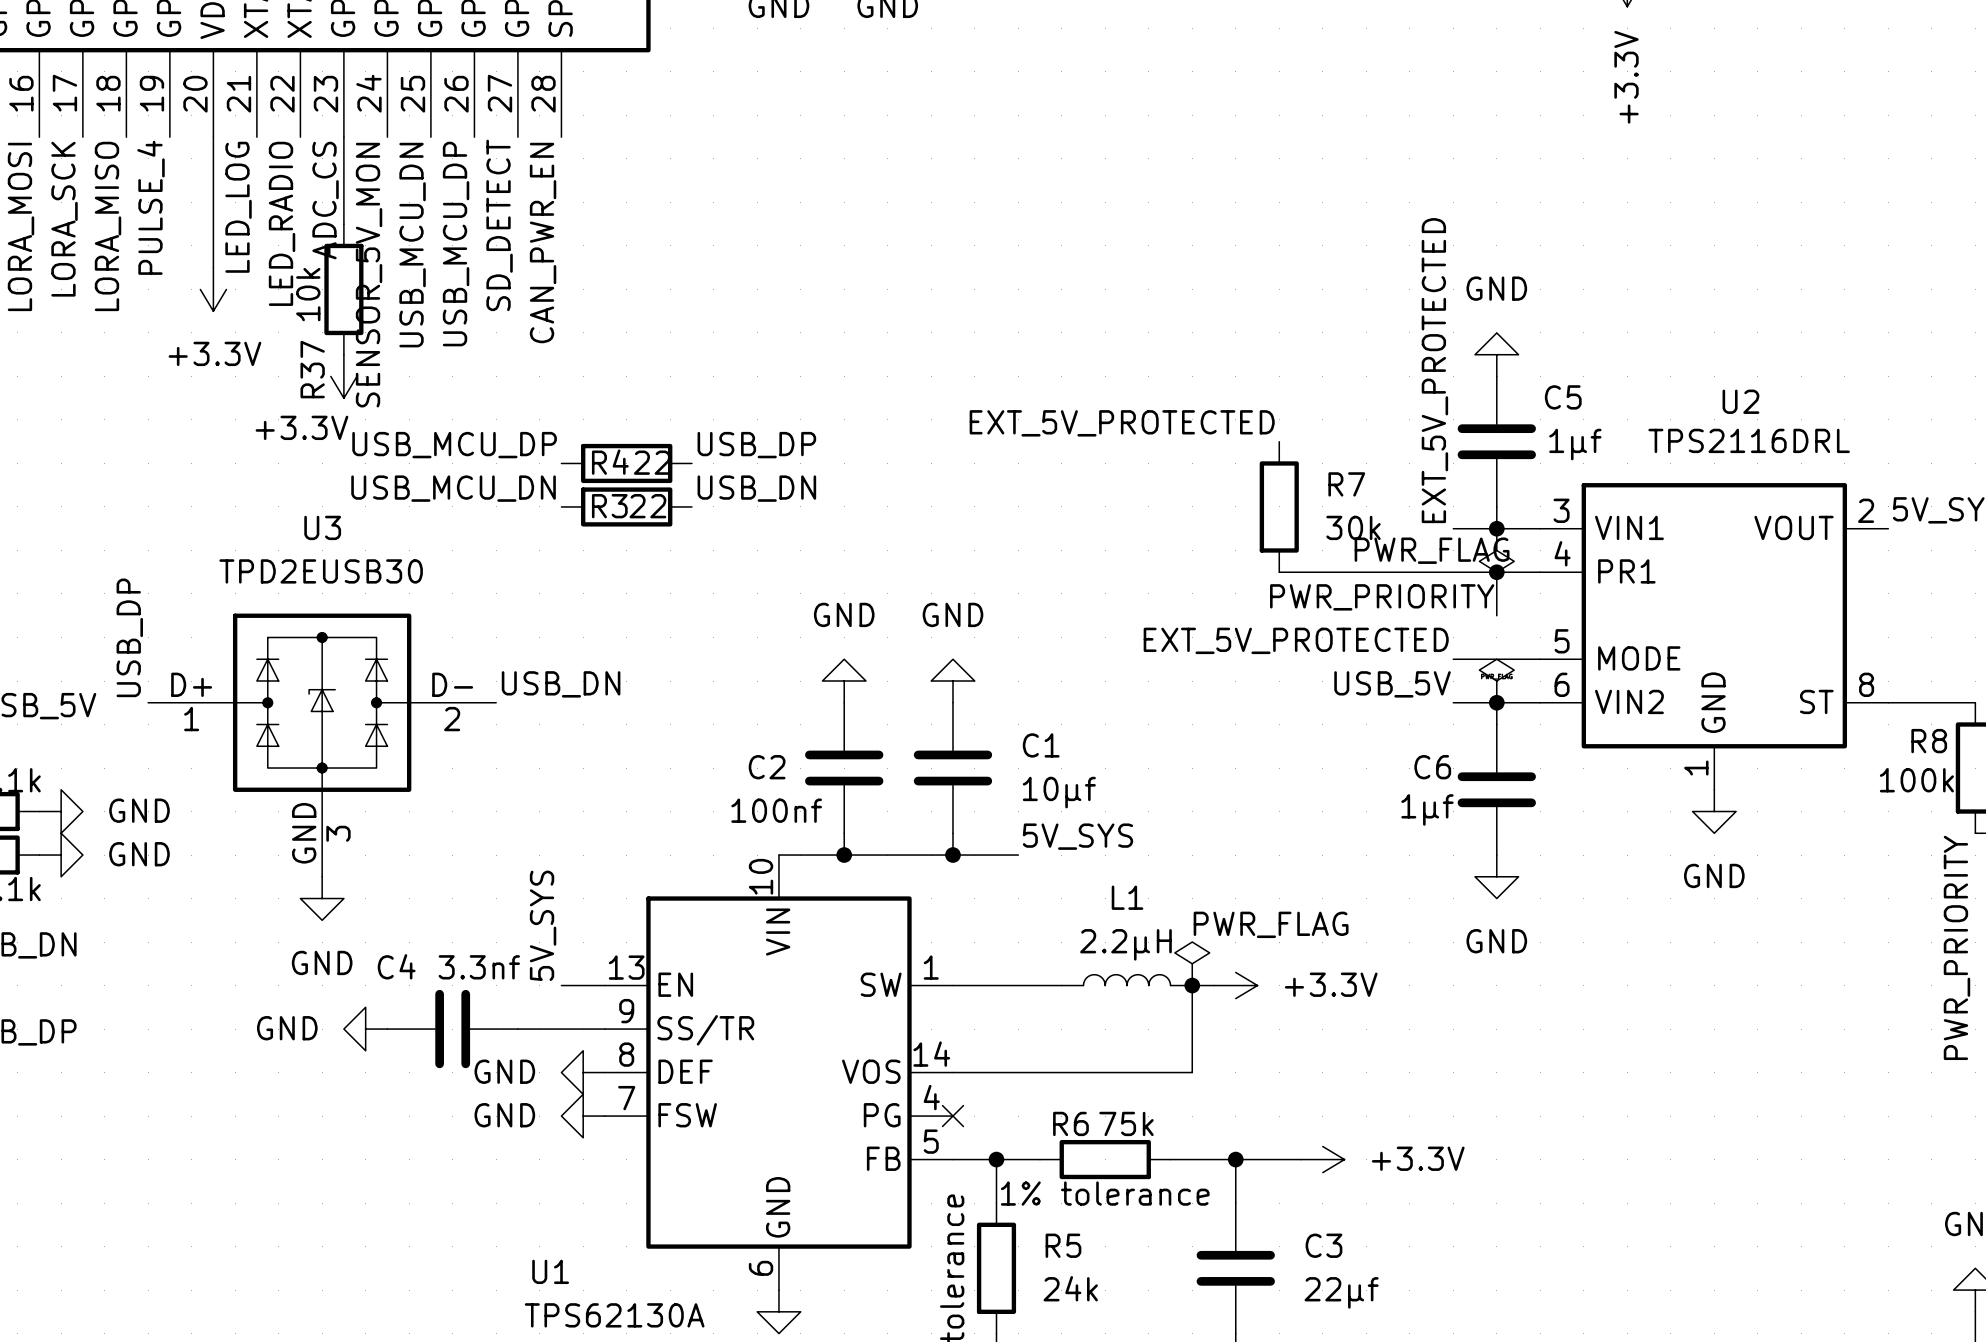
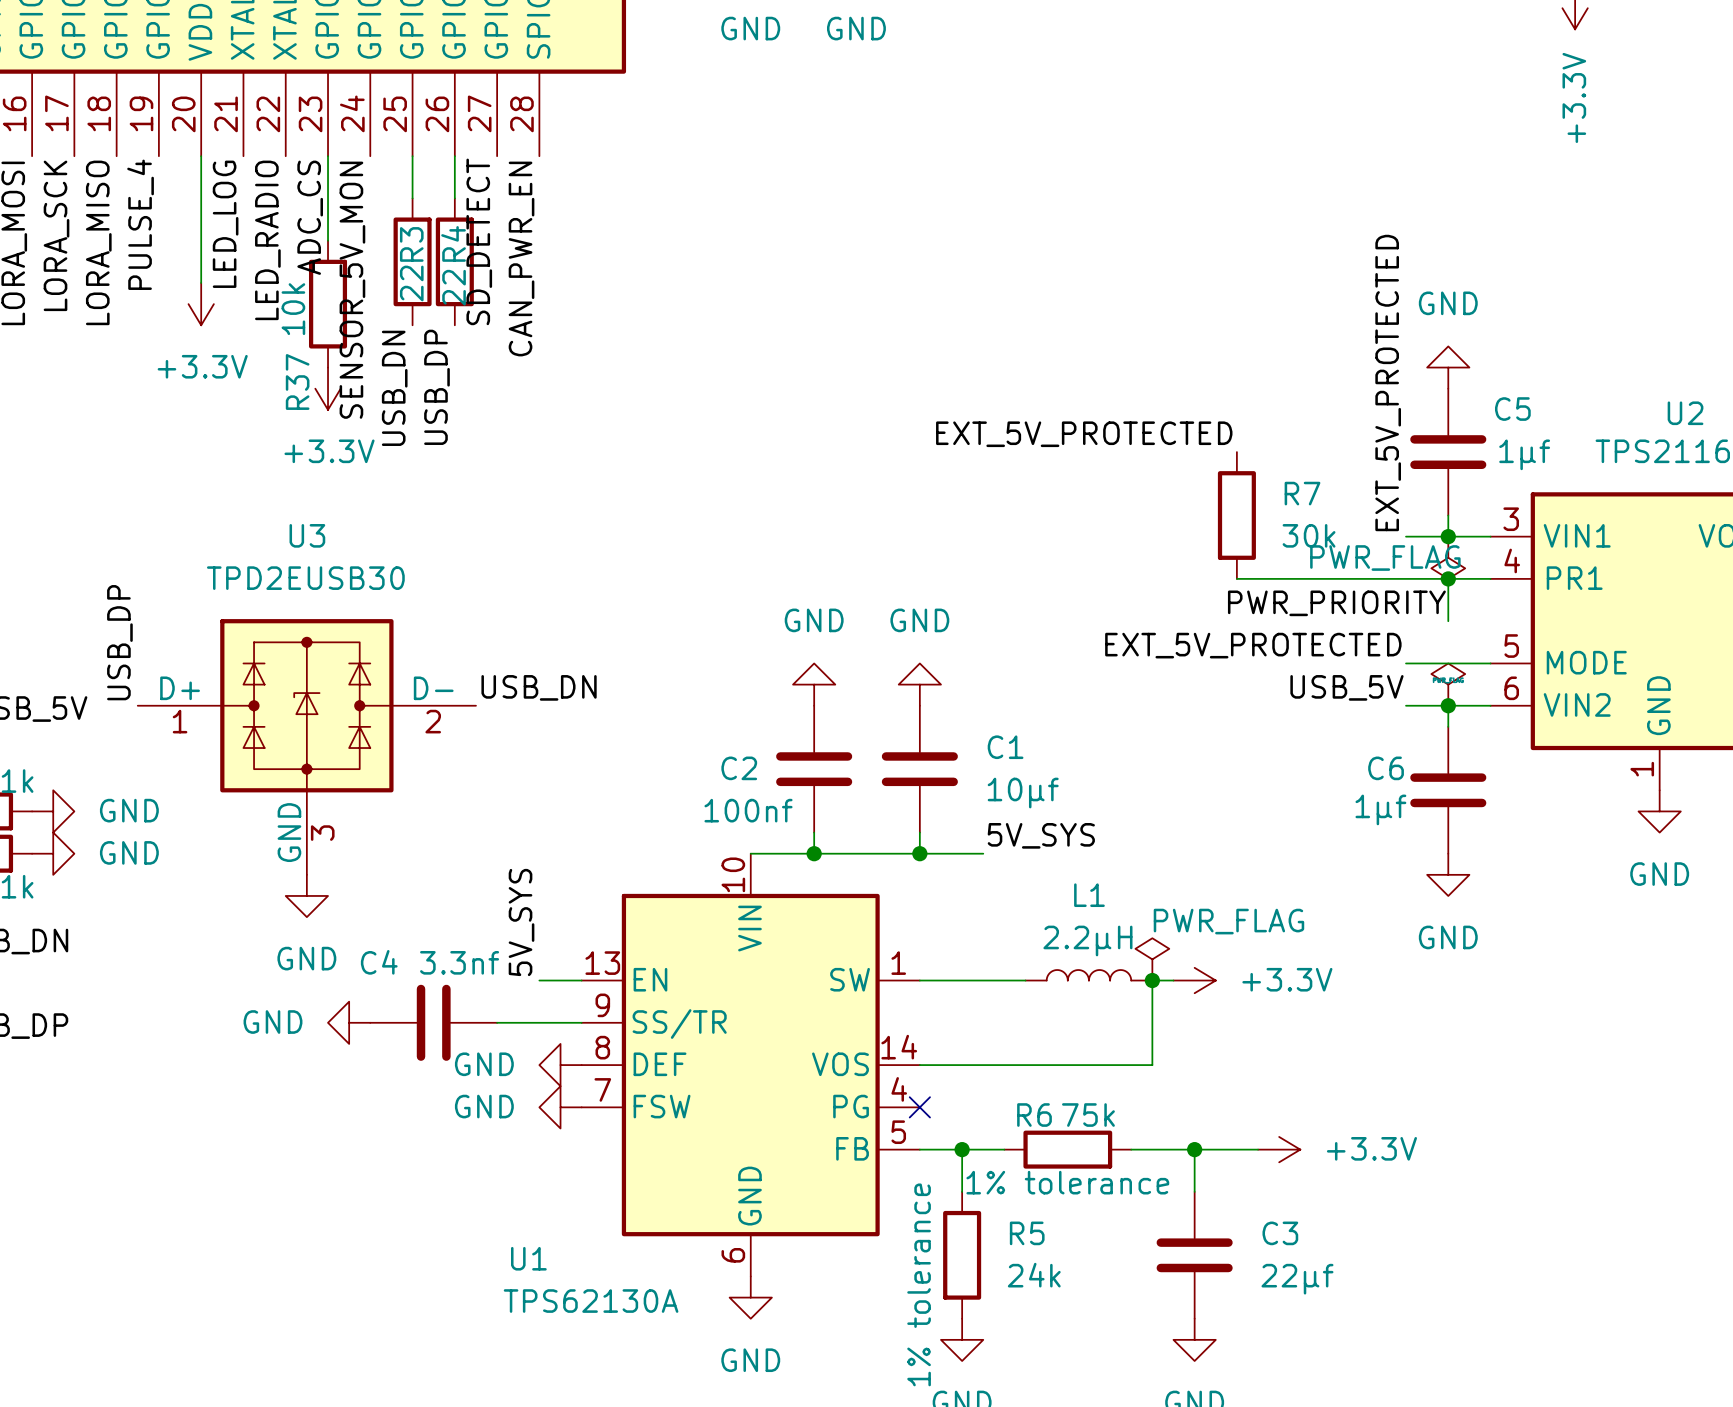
wire: none -> (412, 156) (412, 198)
wire: none -> (454, 156) (454, 198)
label: USB_MCU_DP (456, 244) -> none
label: USB_MCU_DN (412, 245) -> none
power symbol text position: +3.3V (301, 427) -> +3.3V (329, 451)
label: USB_MCU_DP (454, 445) -> none
label rotation: 0° (756, 445) -> 90° counterclockwise (436, 387)
label position: USB_DP (756, 445) -> USB_DP (436, 387)
R4 rotation: 0° (626, 463) -> 90° clockwise (454, 261)
R4 position: (626, 463) -> (454, 261)
label: USB_MCU_DN (453, 488) -> none
label rotation: 0° (756, 488) -> 90° counterclockwise (394, 388)
label position: USB_DN (756, 488) -> USB_DN (394, 388)
R3 rotation: 0° (626, 506) -> 90° clockwise (412, 261)
R3 position: (626, 506) -> (412, 261)

